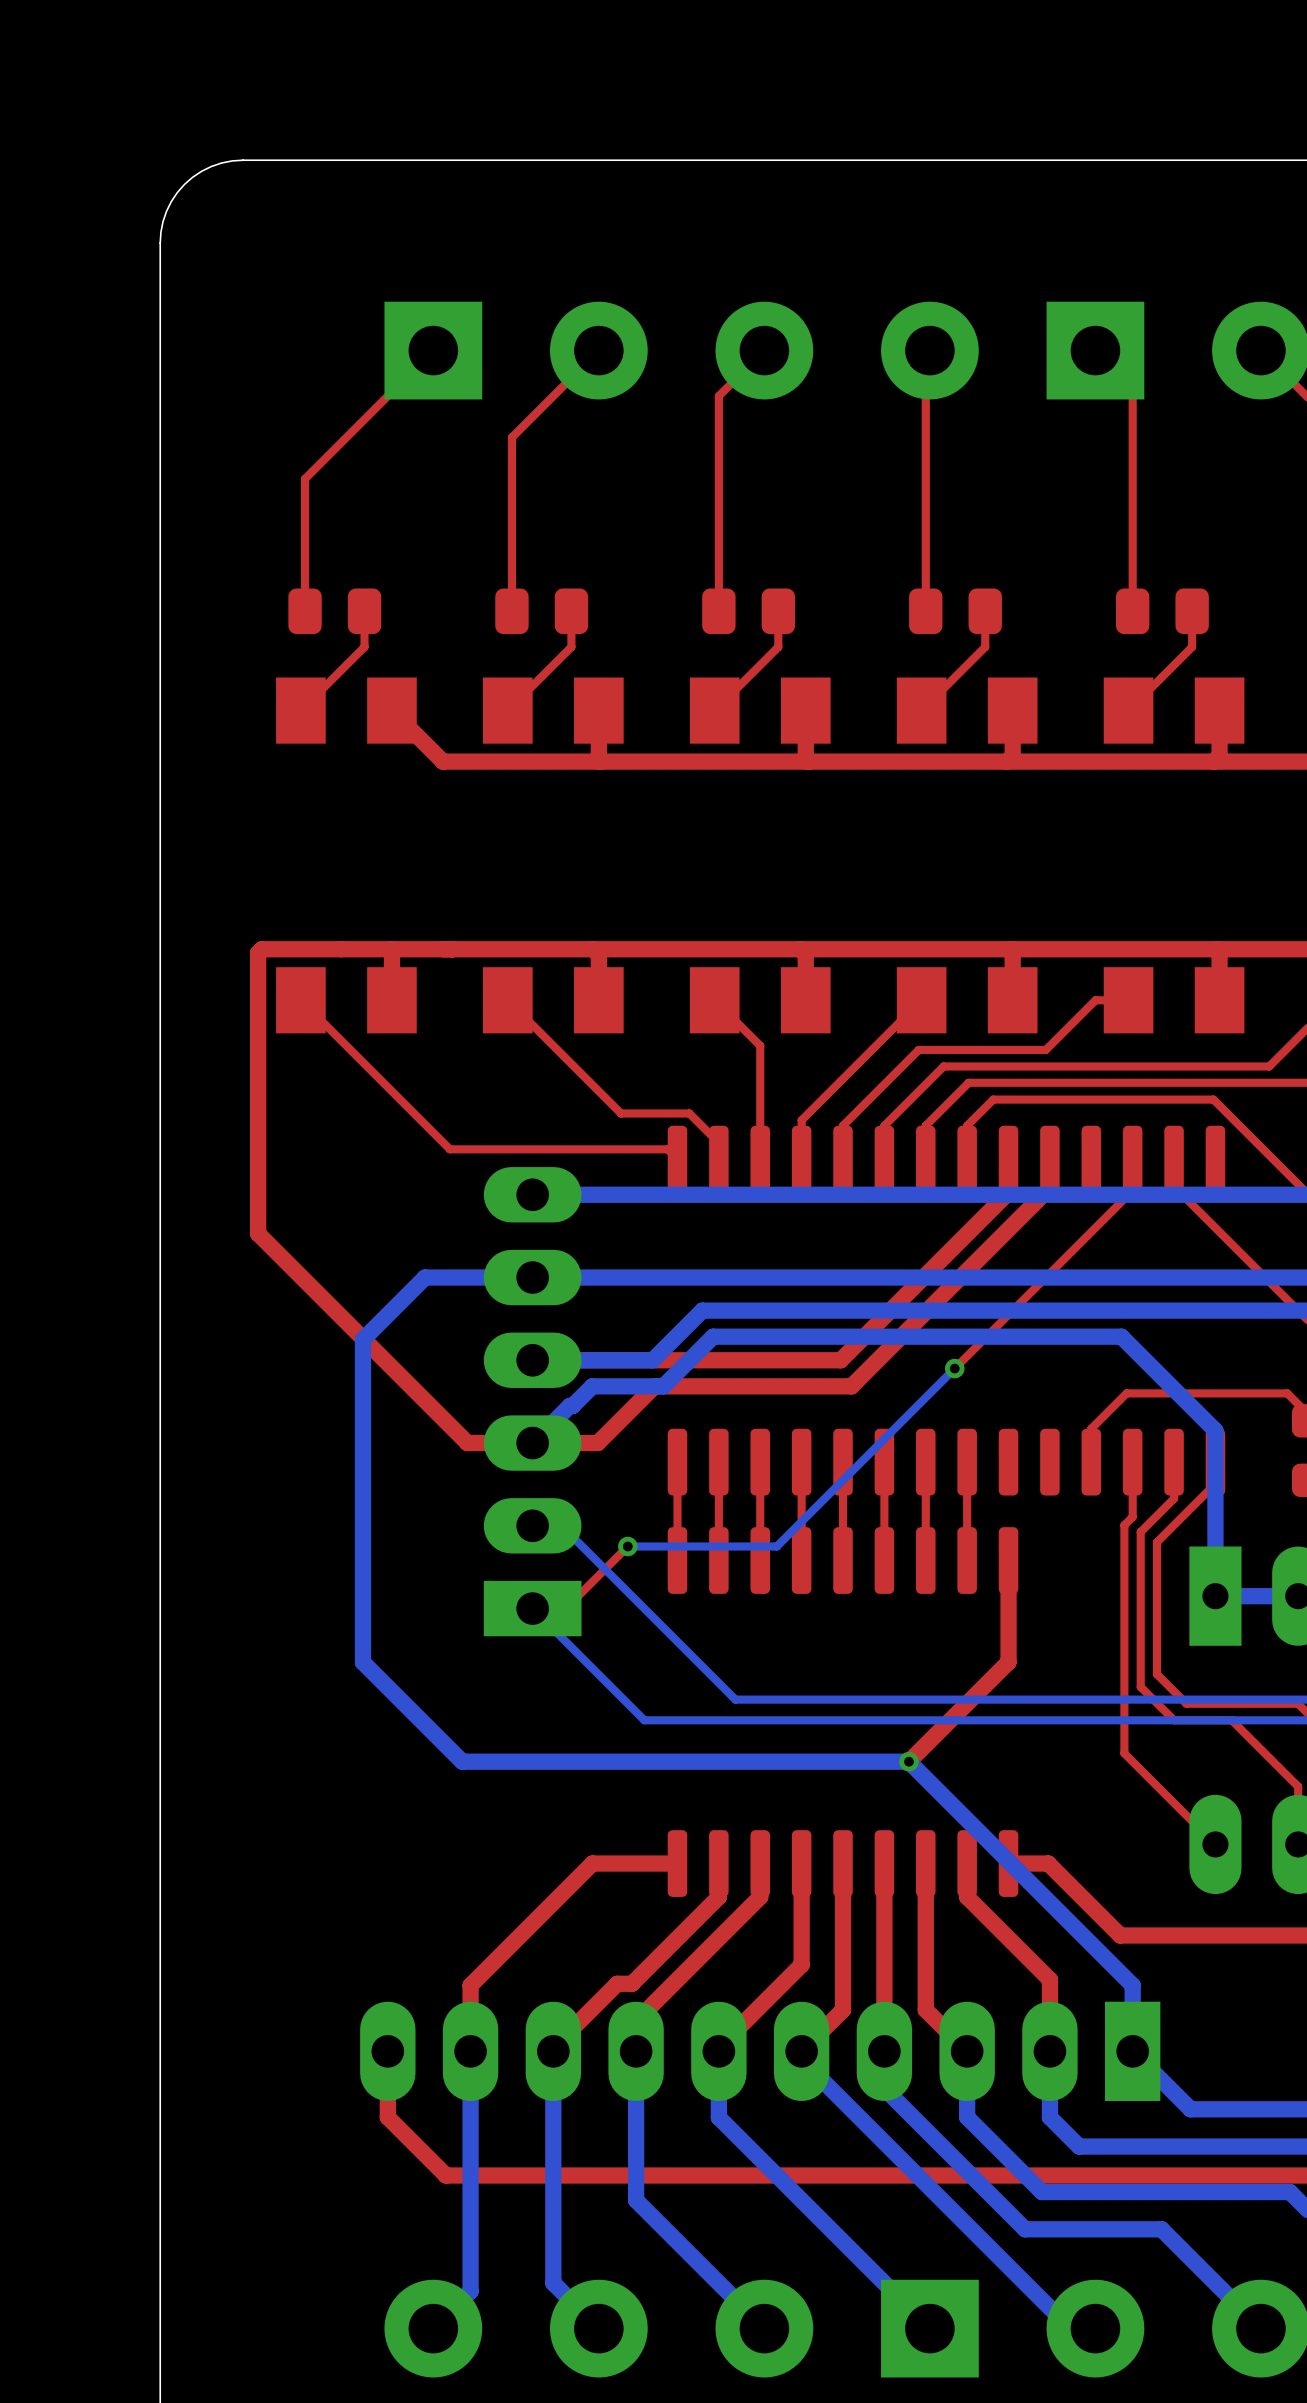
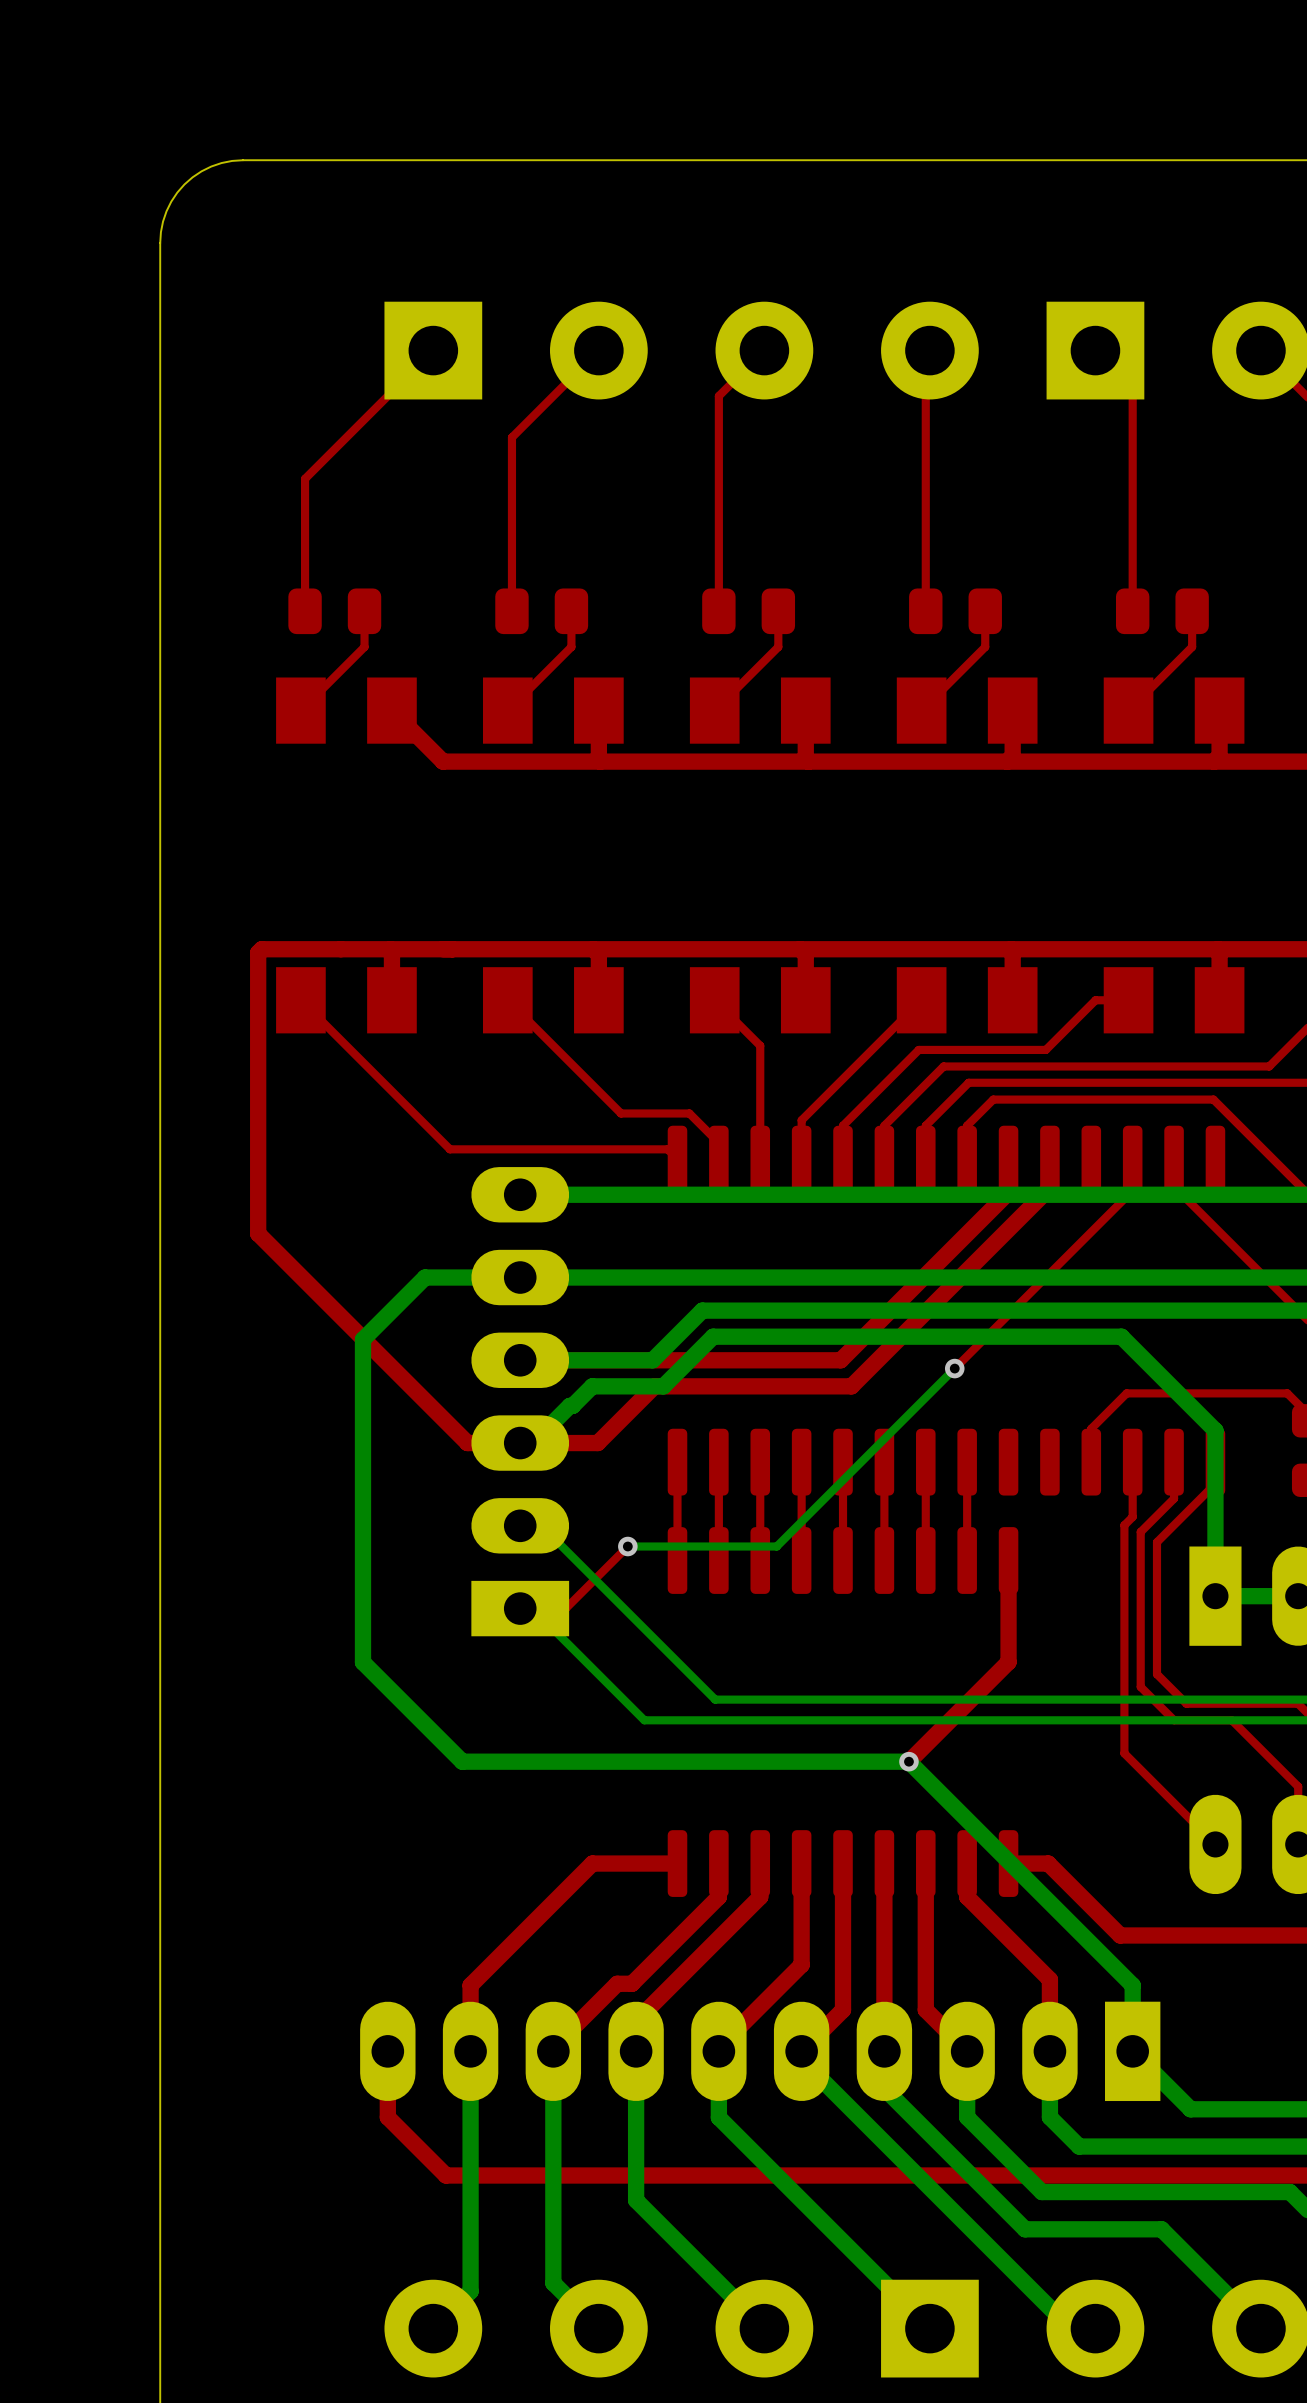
part position: (532, 1401) -> (520, 1401)
bottom track: (541, 1525) (561, 1525) (735, 1699) -> (541, 1525) (715, 1699) (735, 1699)

